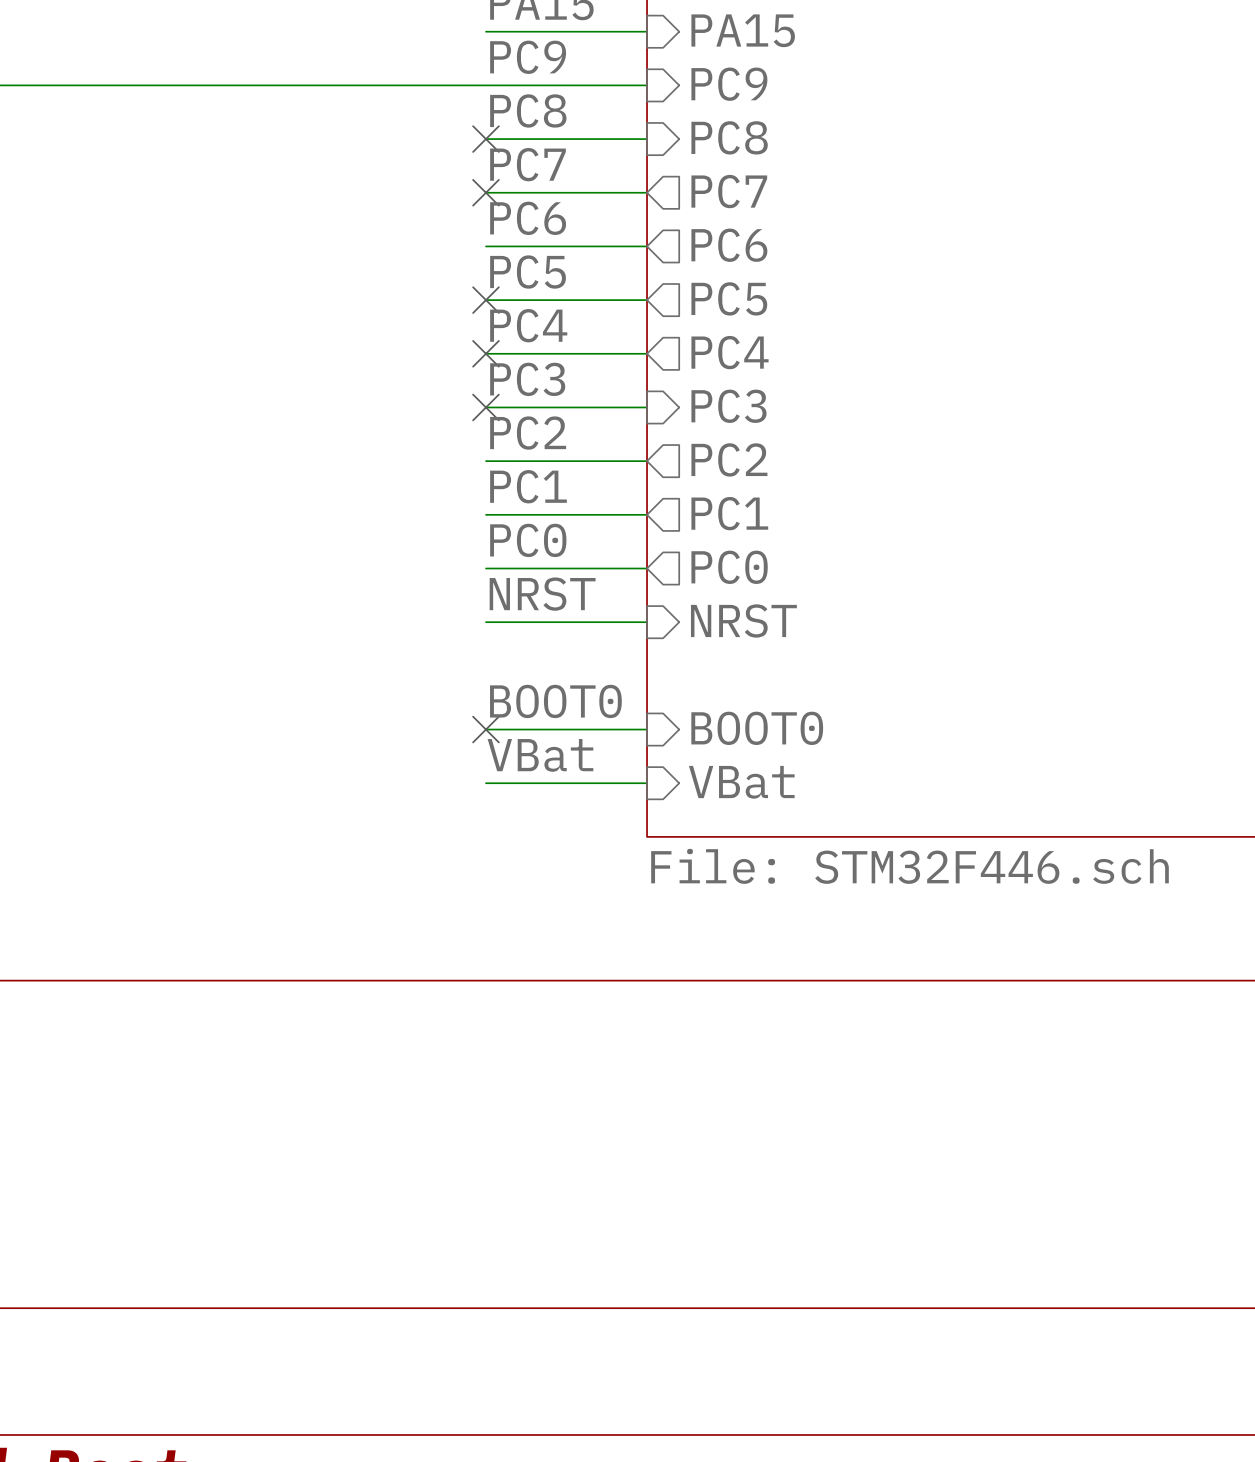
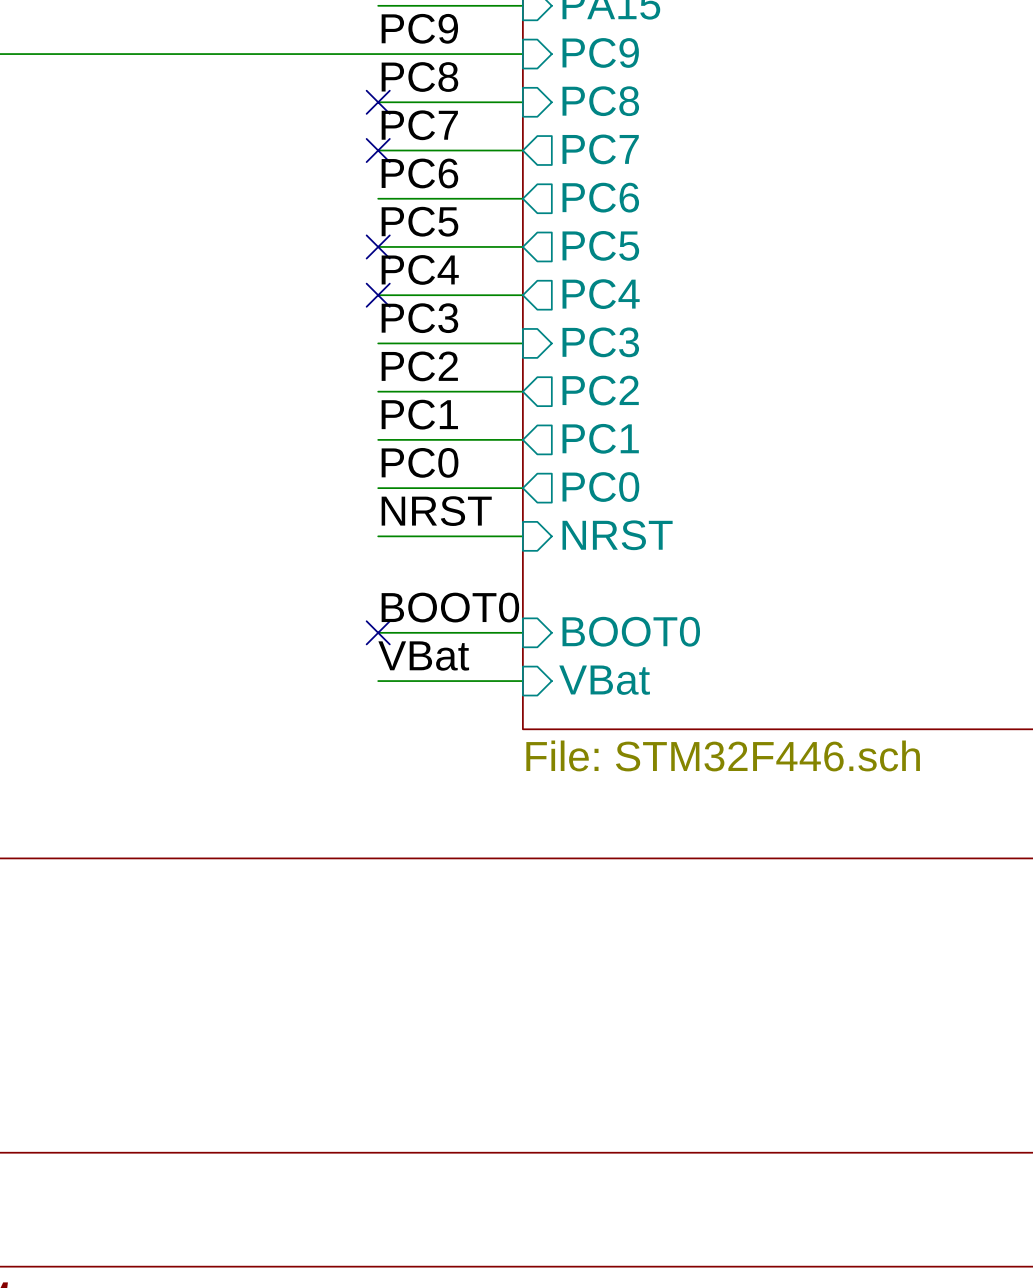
no-connect mark: (485, 407) -> none

